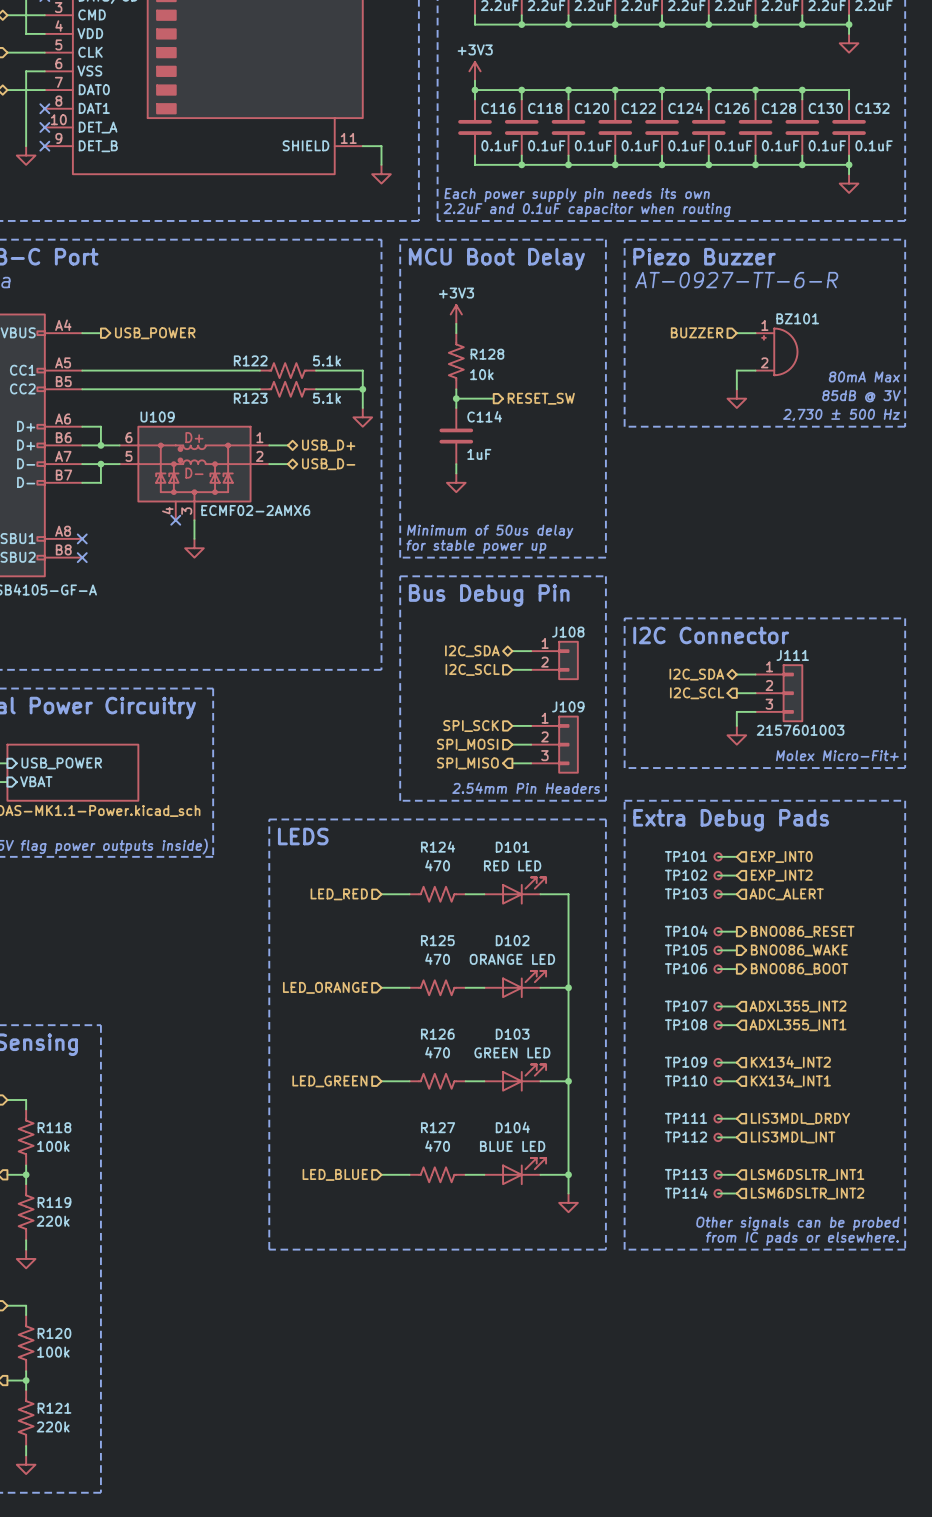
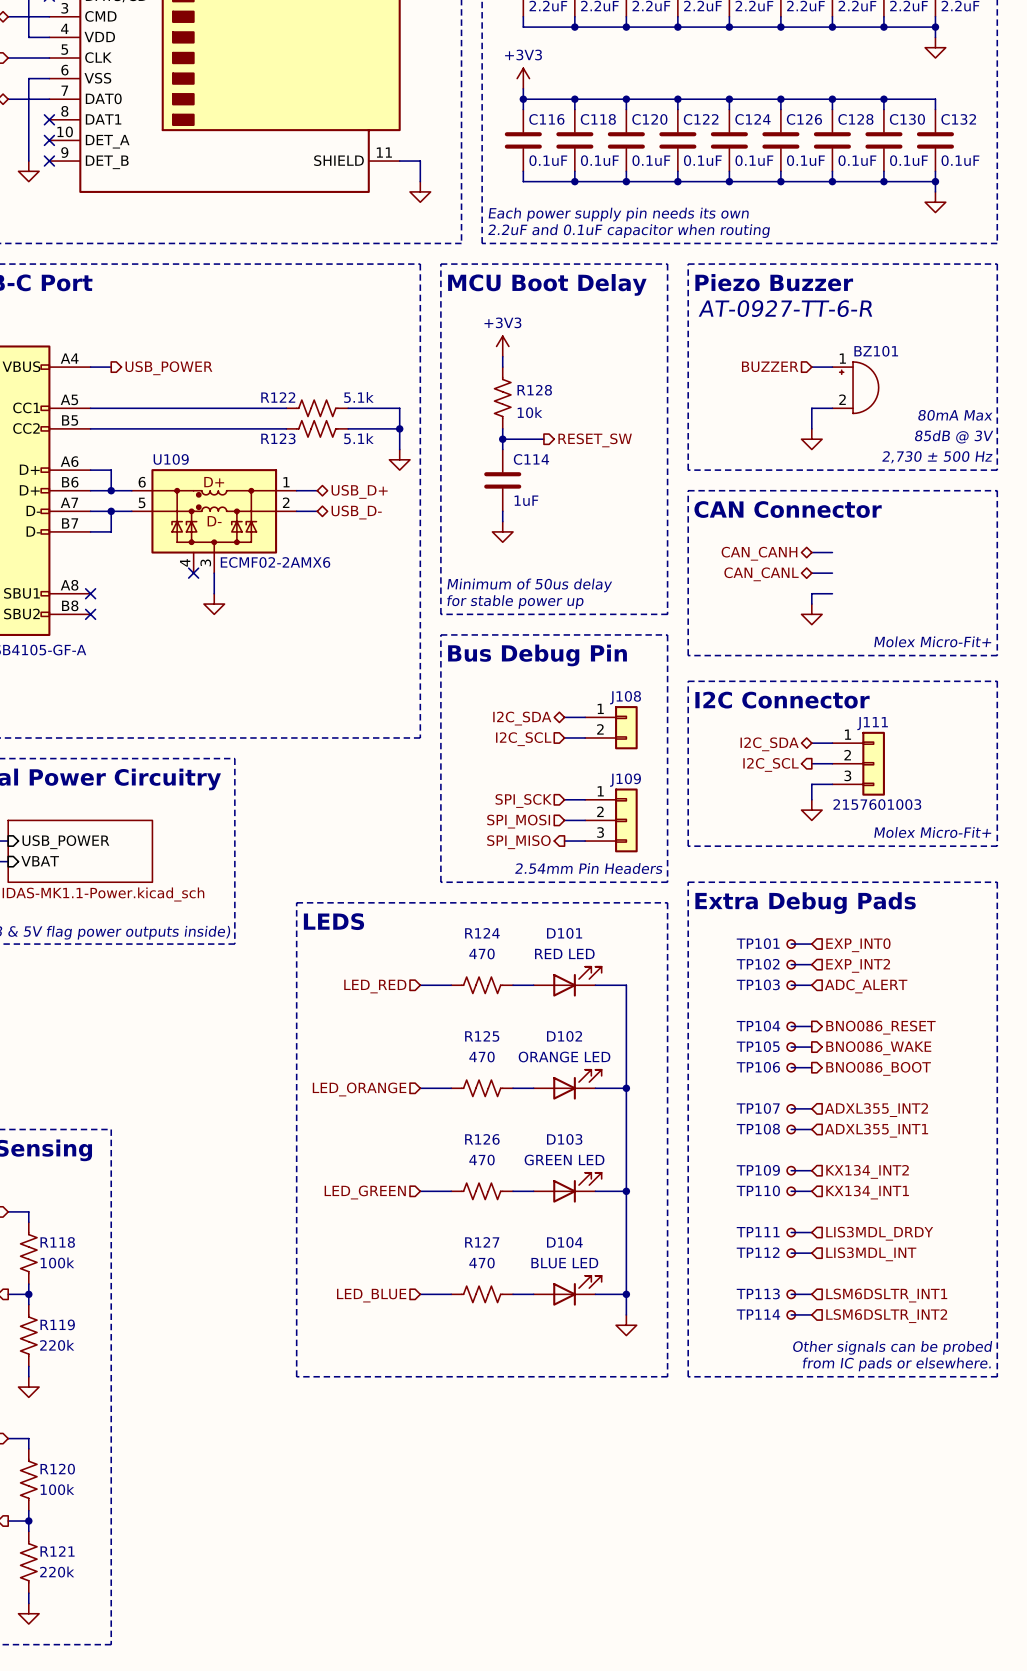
line: none -> (688, 490) (688, 655) (997, 655) (997, 490) (688, 490)
text: none -> CAN Connector (788, 509)
hierarchical label: none -> CAN_CANH (759, 553)
wire: none -> (811, 552) (832, 552)
hierarchical label: none -> CAN_CANL (761, 574)
wire: none -> (811, 573) (832, 573)
wire: none -> (832, 593) (811, 593) (811, 604)
power symbol: none -> (811, 614)
text: none -> Molex Micro-Fit+ (932, 641)

